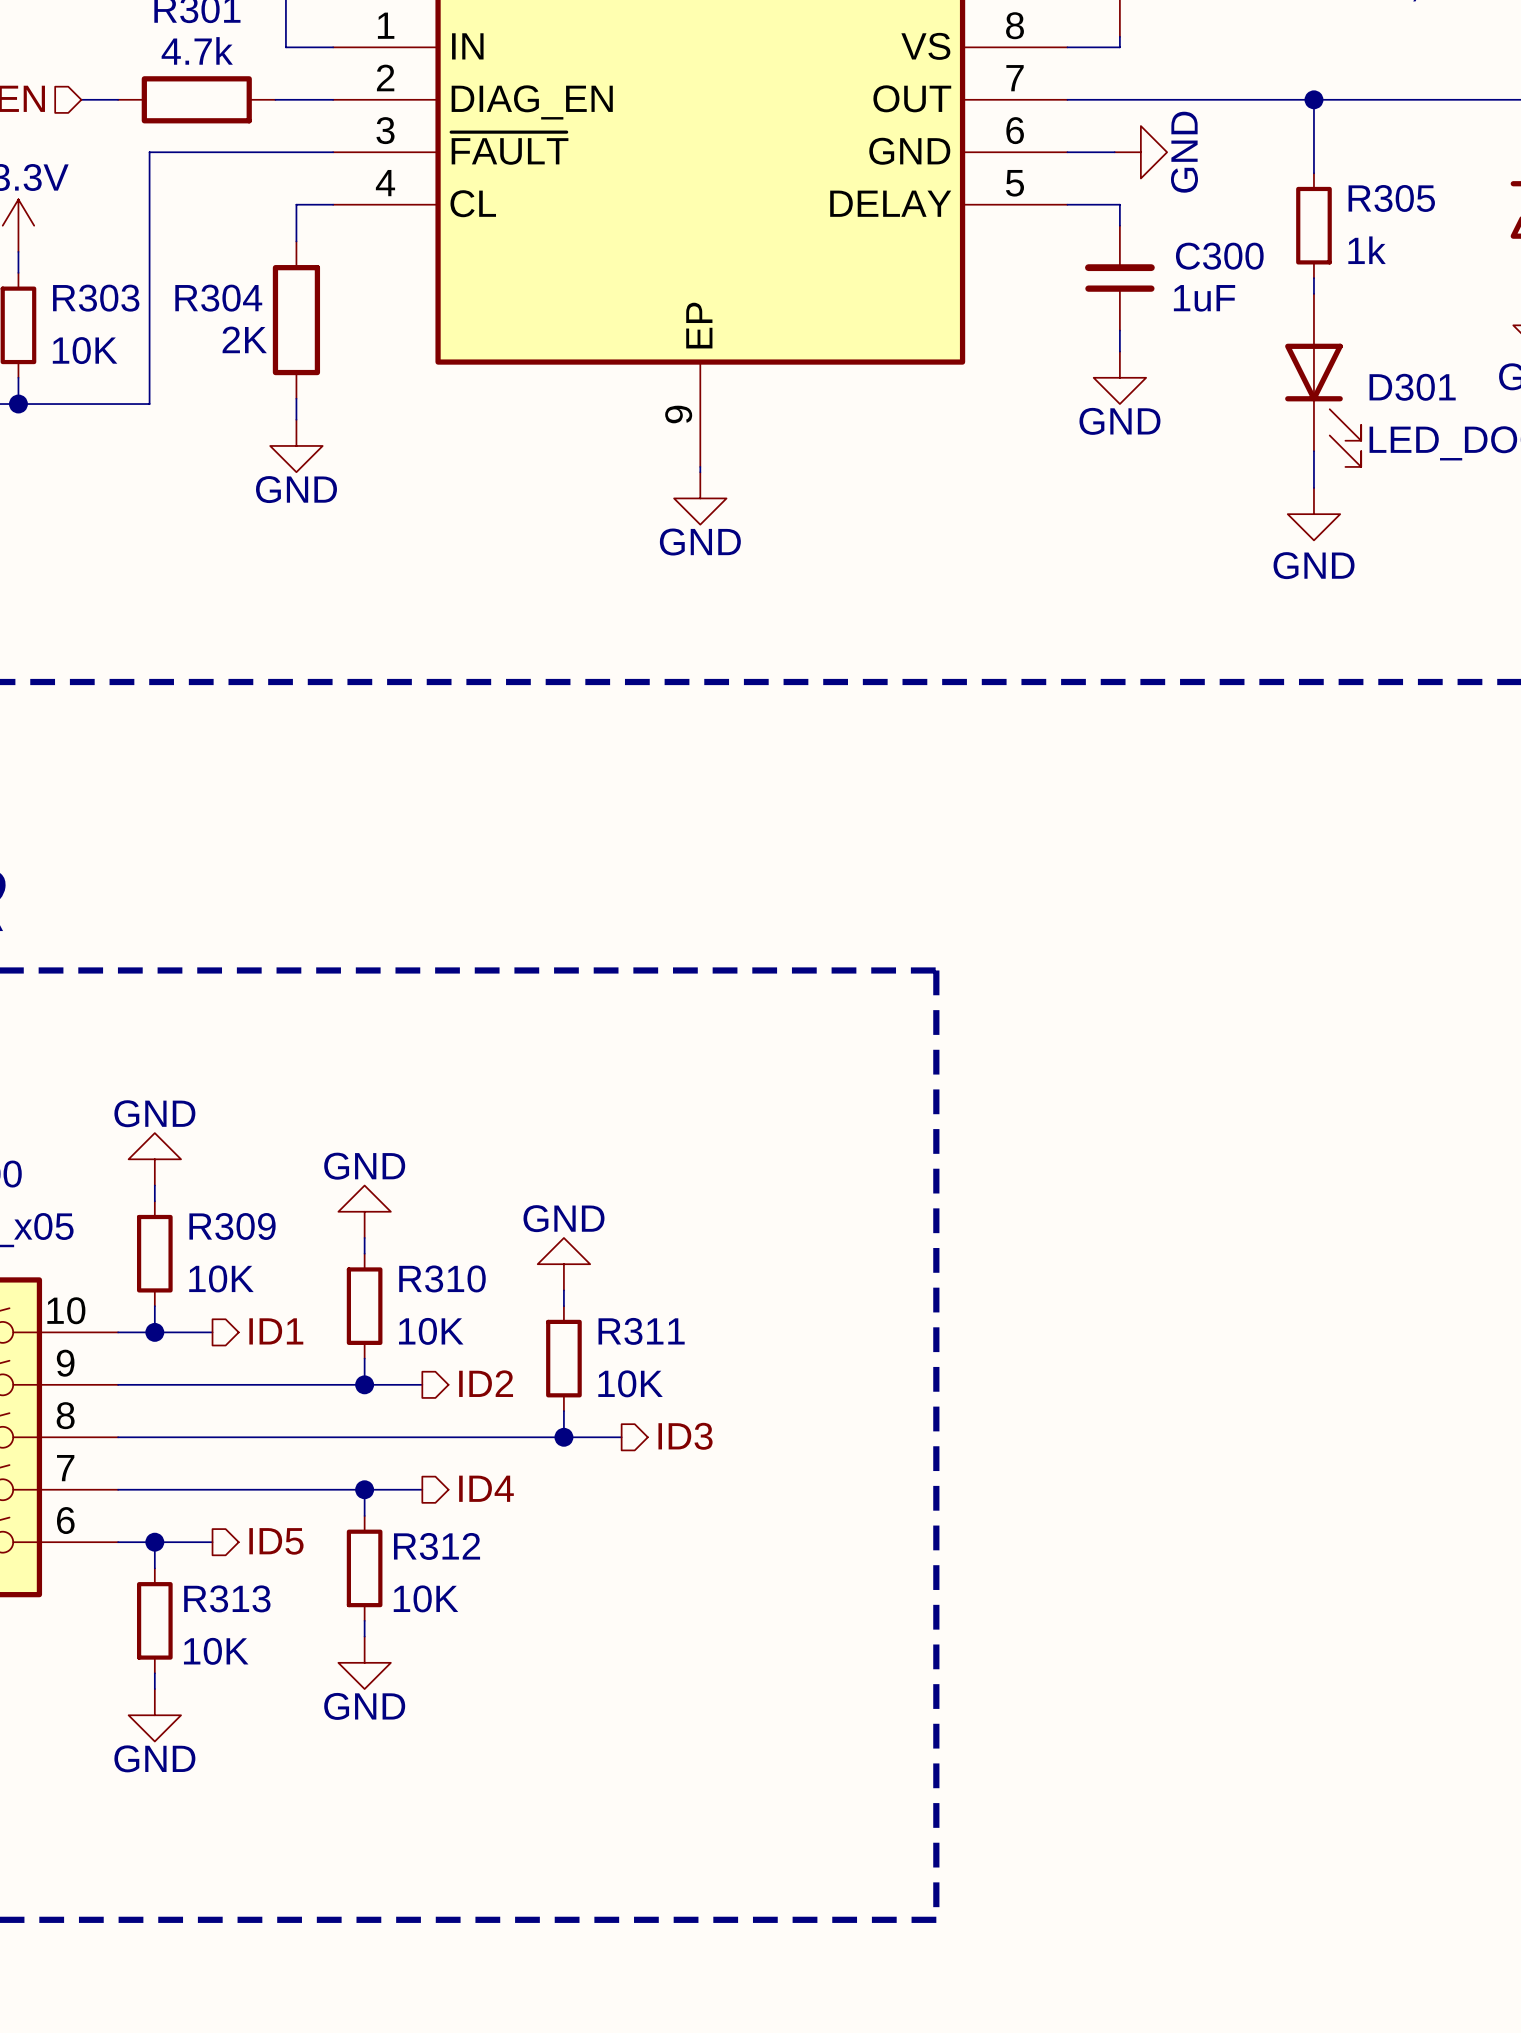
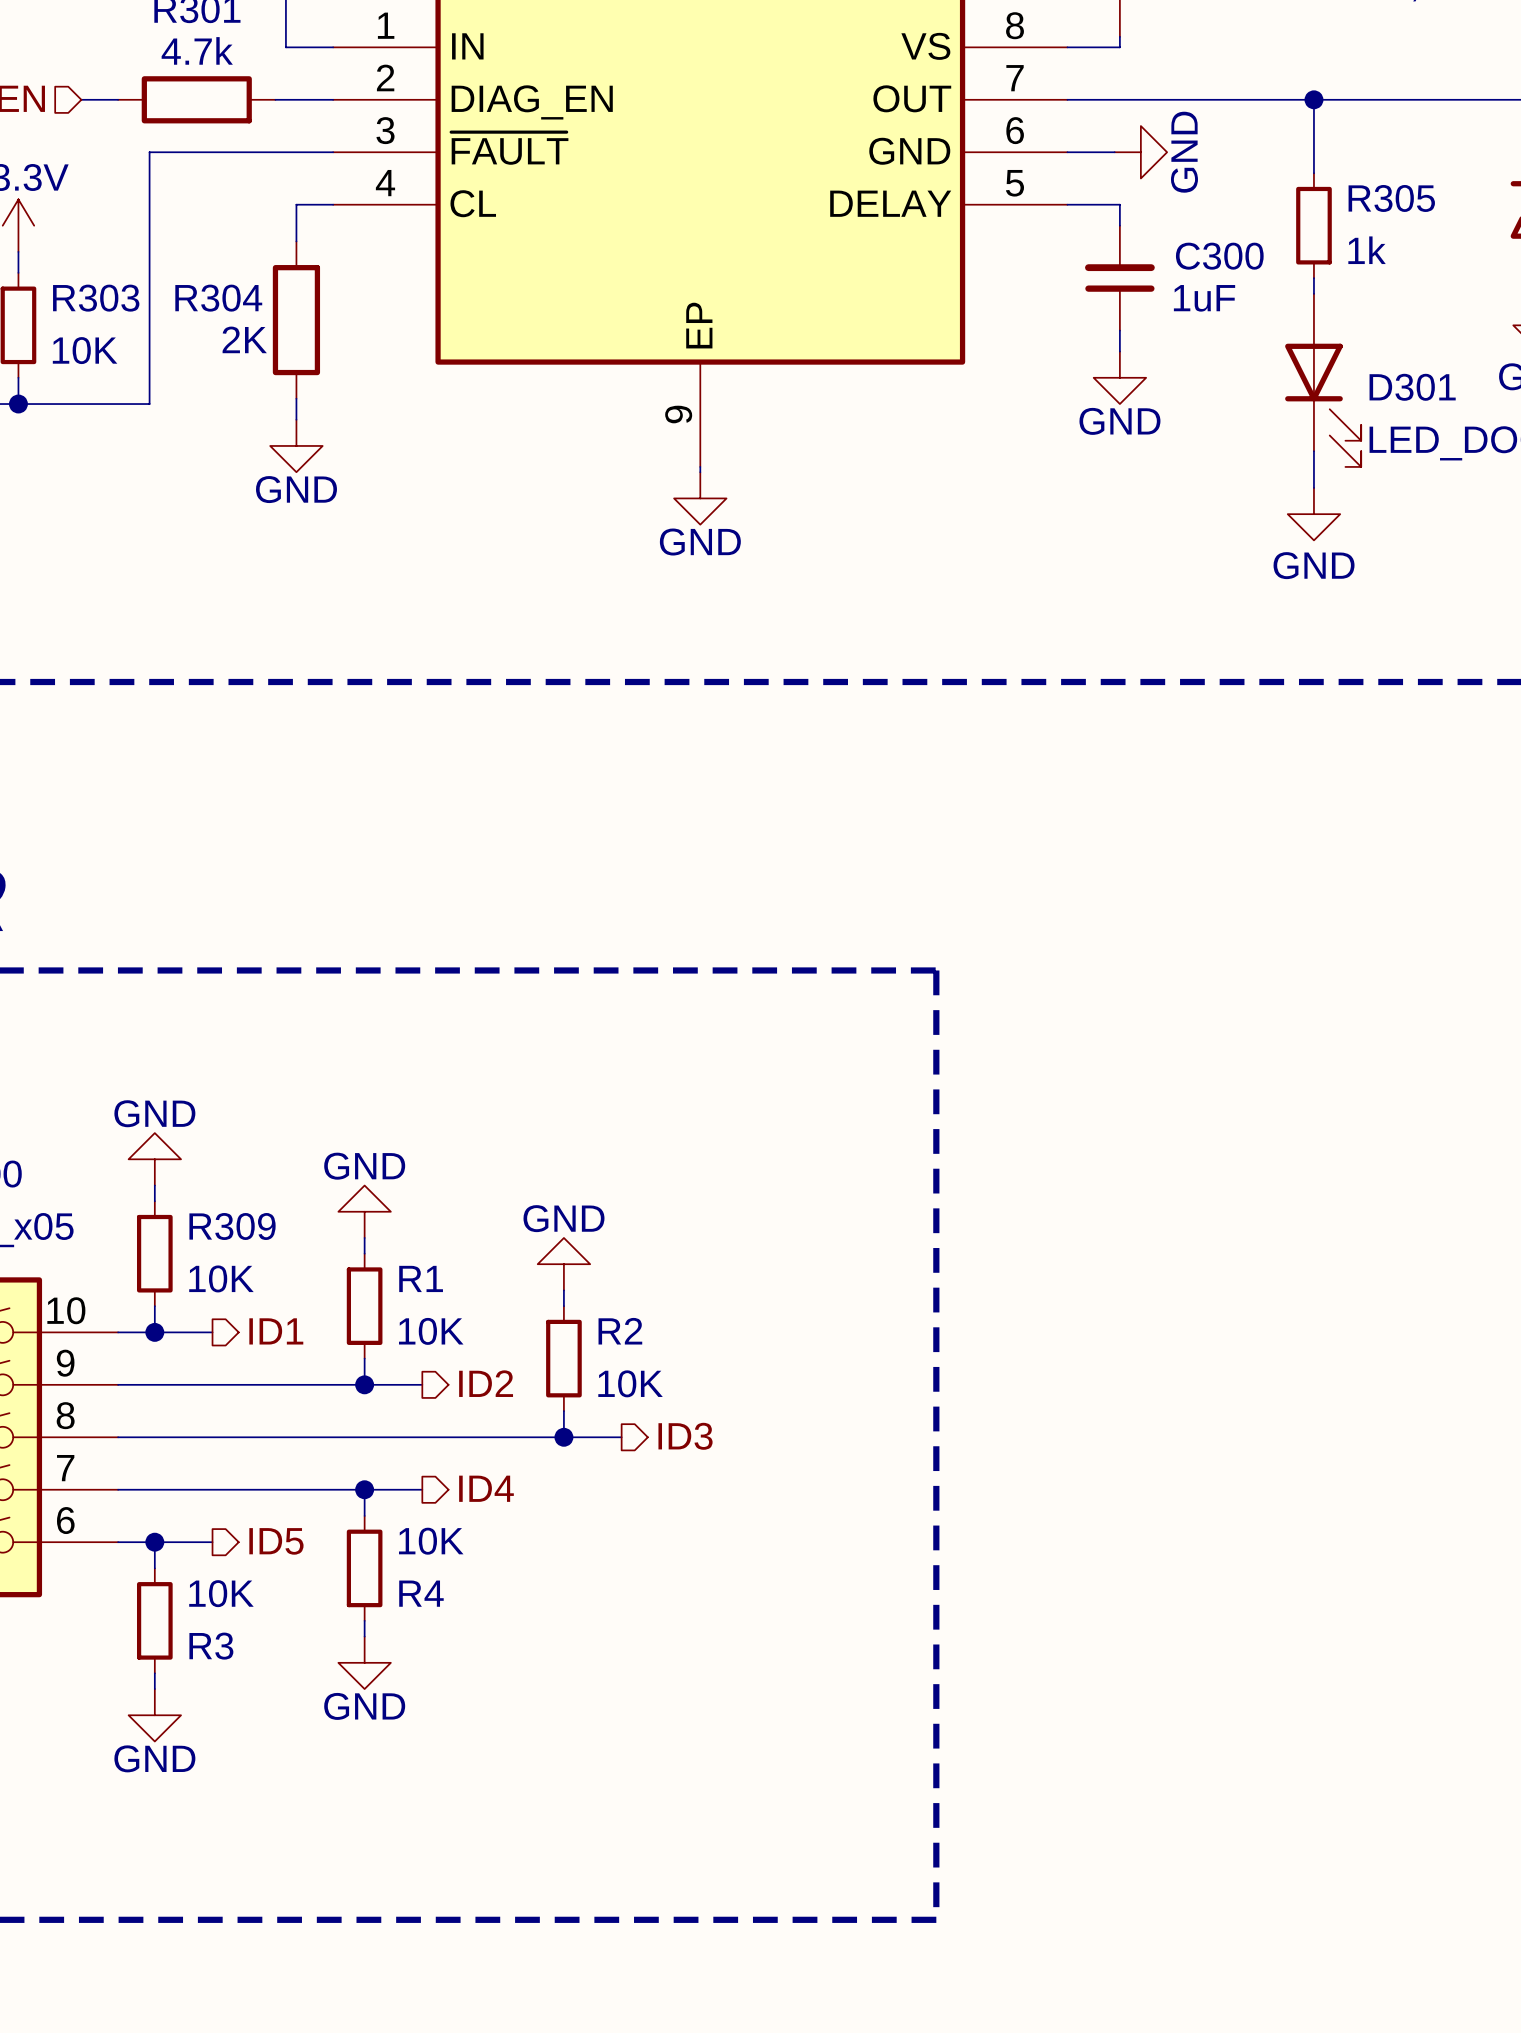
R310 name: R310 (442, 1278) -> R1 (421, 1278)
R311 name: R311 (641, 1331) -> R2 (620, 1331)
R312 name: R312 (437, 1546) -> R4 (421, 1593)
R313 name: R313 (227, 1598) -> R3 (211, 1646)
R312 value position: 10K (426, 1598) -> 10K (431, 1541)
R313 value position: 10K (216, 1651) -> 10K (221, 1593)

